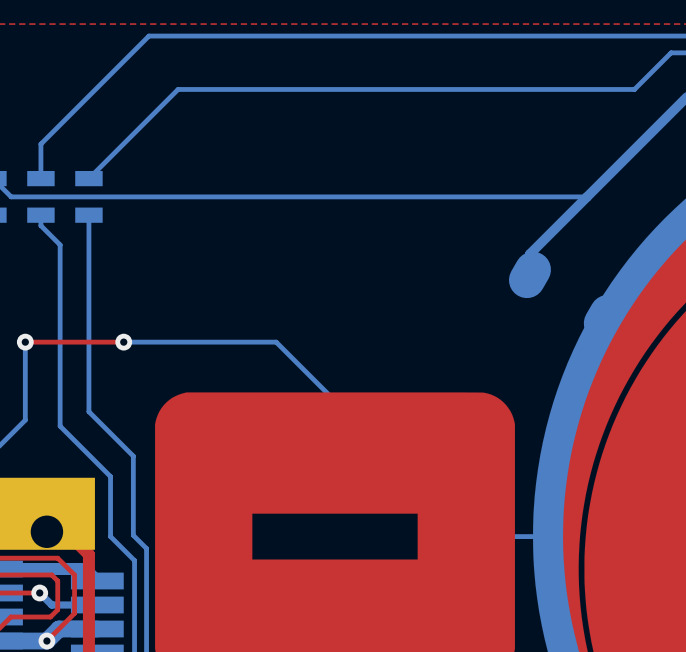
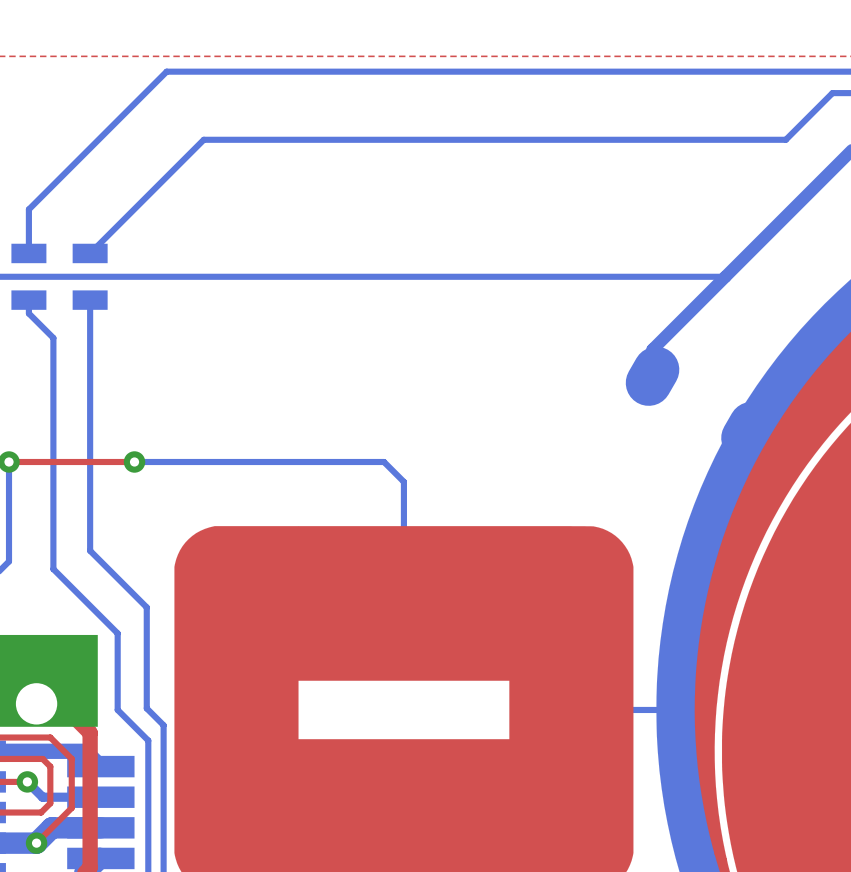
bottom track: (276, 342) (335, 400) -> (328, 462) (384, 462) (403, 481) (403, 537)

